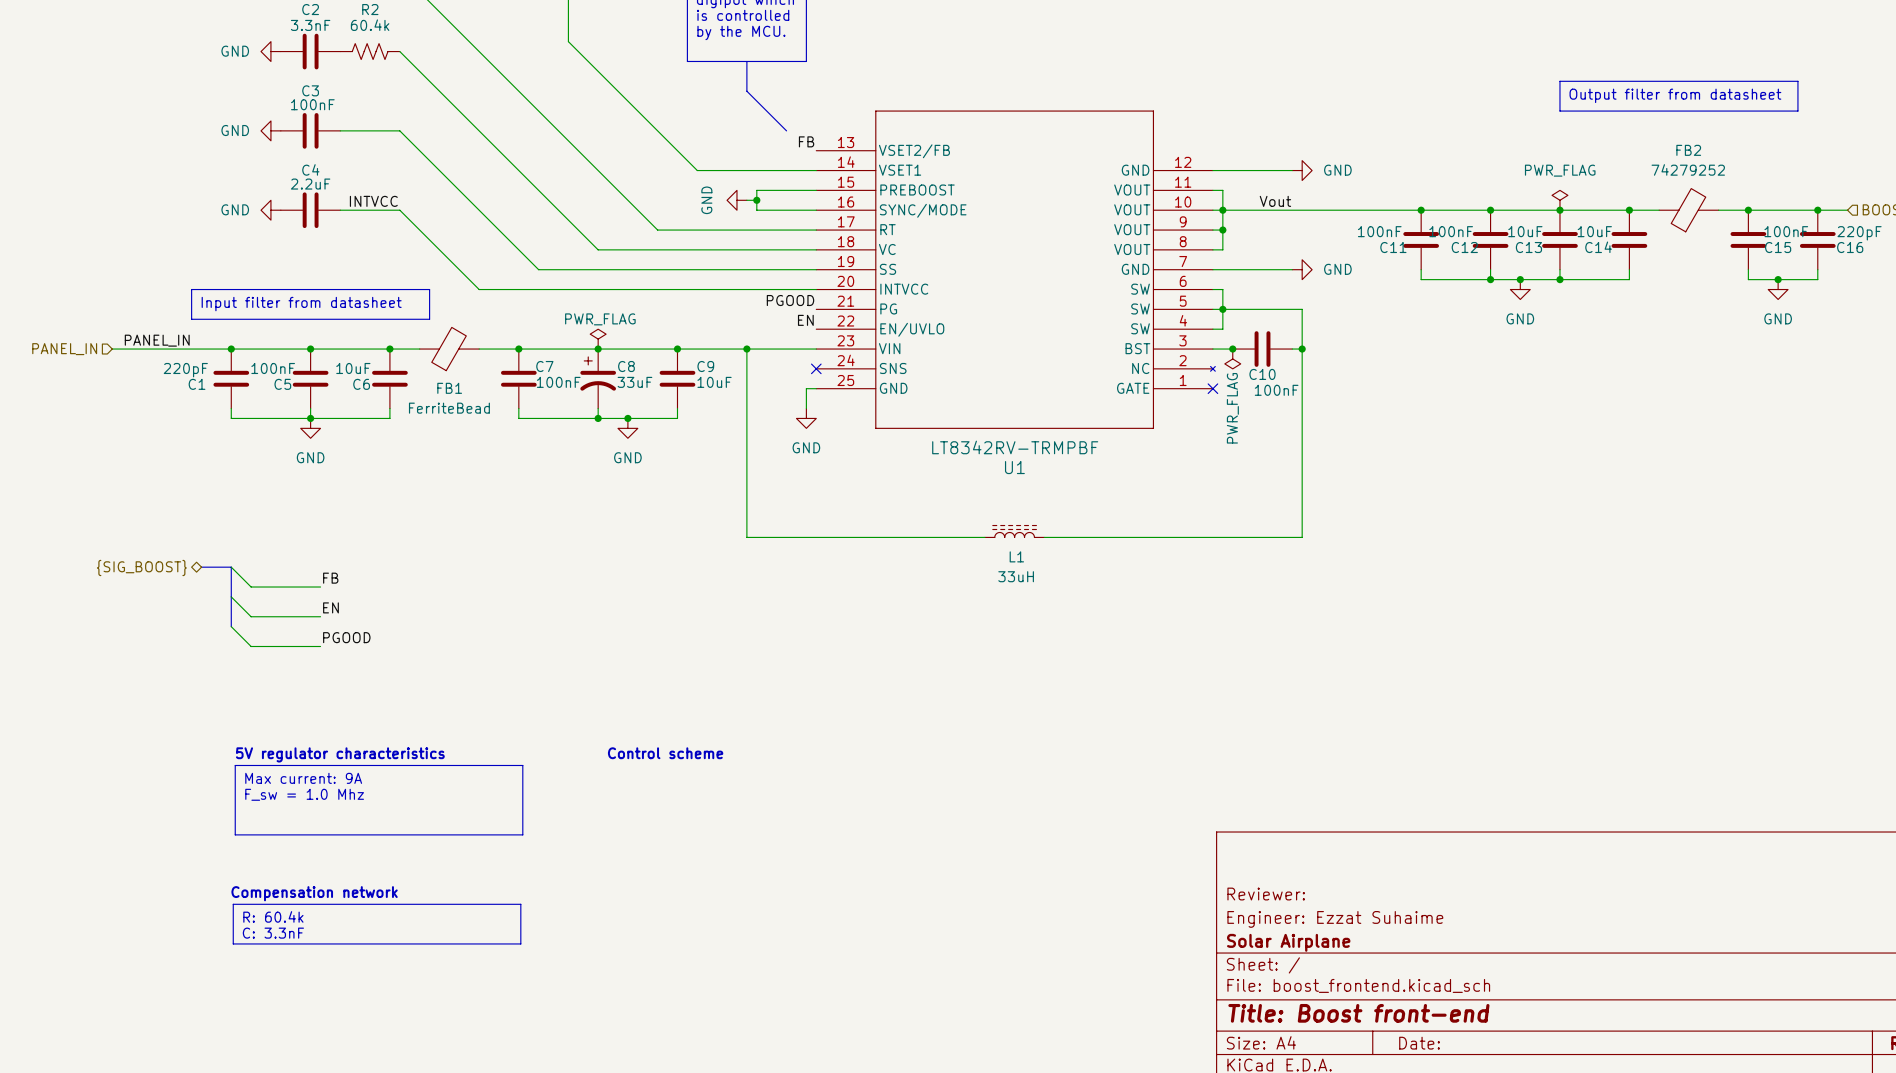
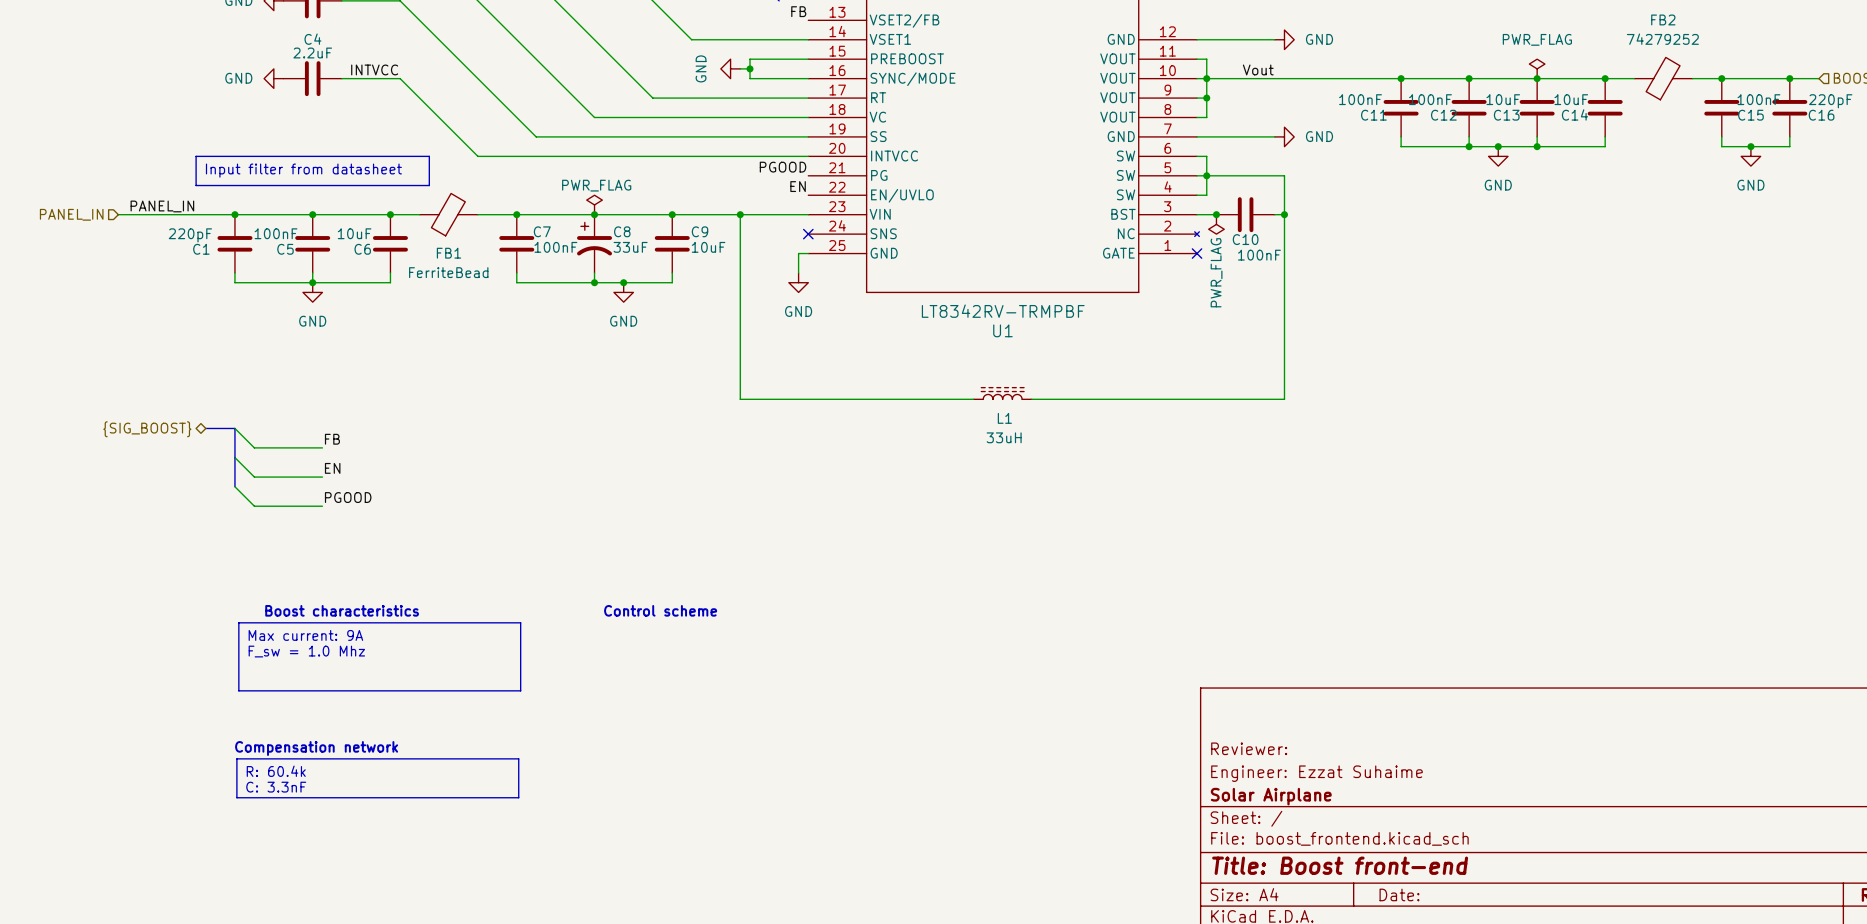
text: 5V regulator characteristics (340, 754) -> Boost characteristics (342, 610)

